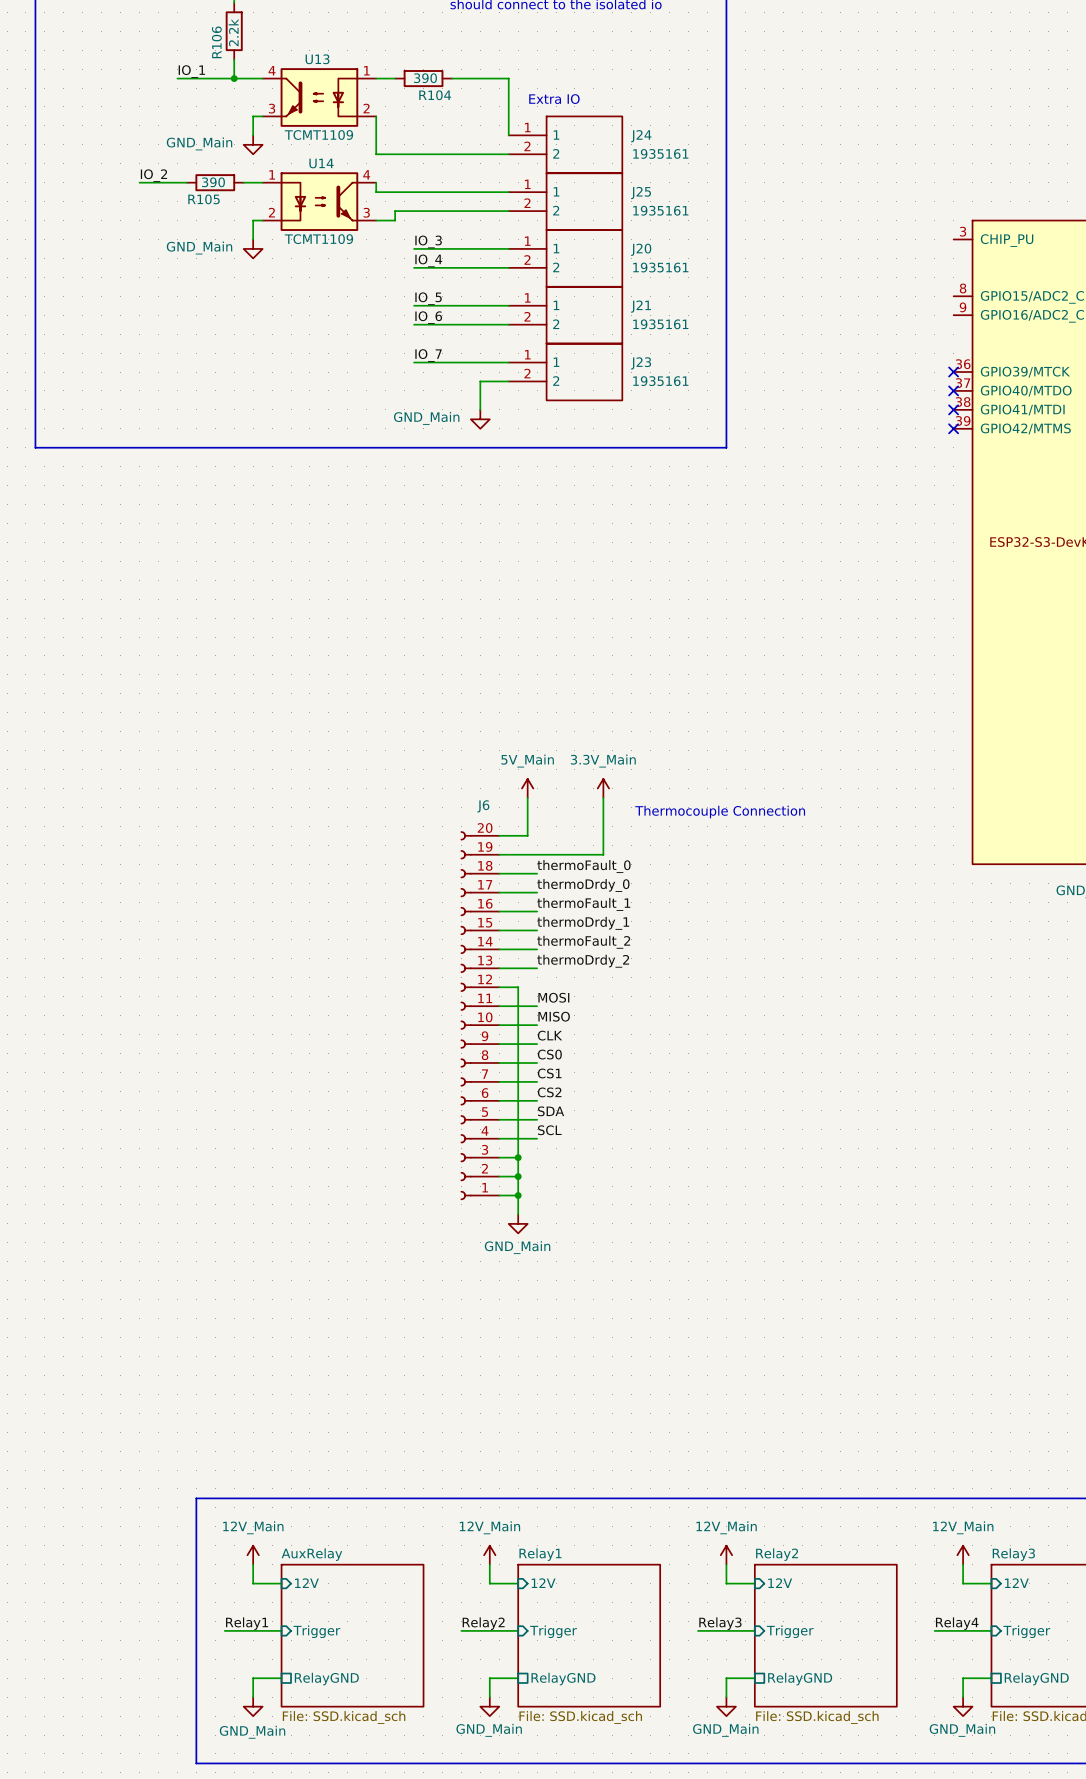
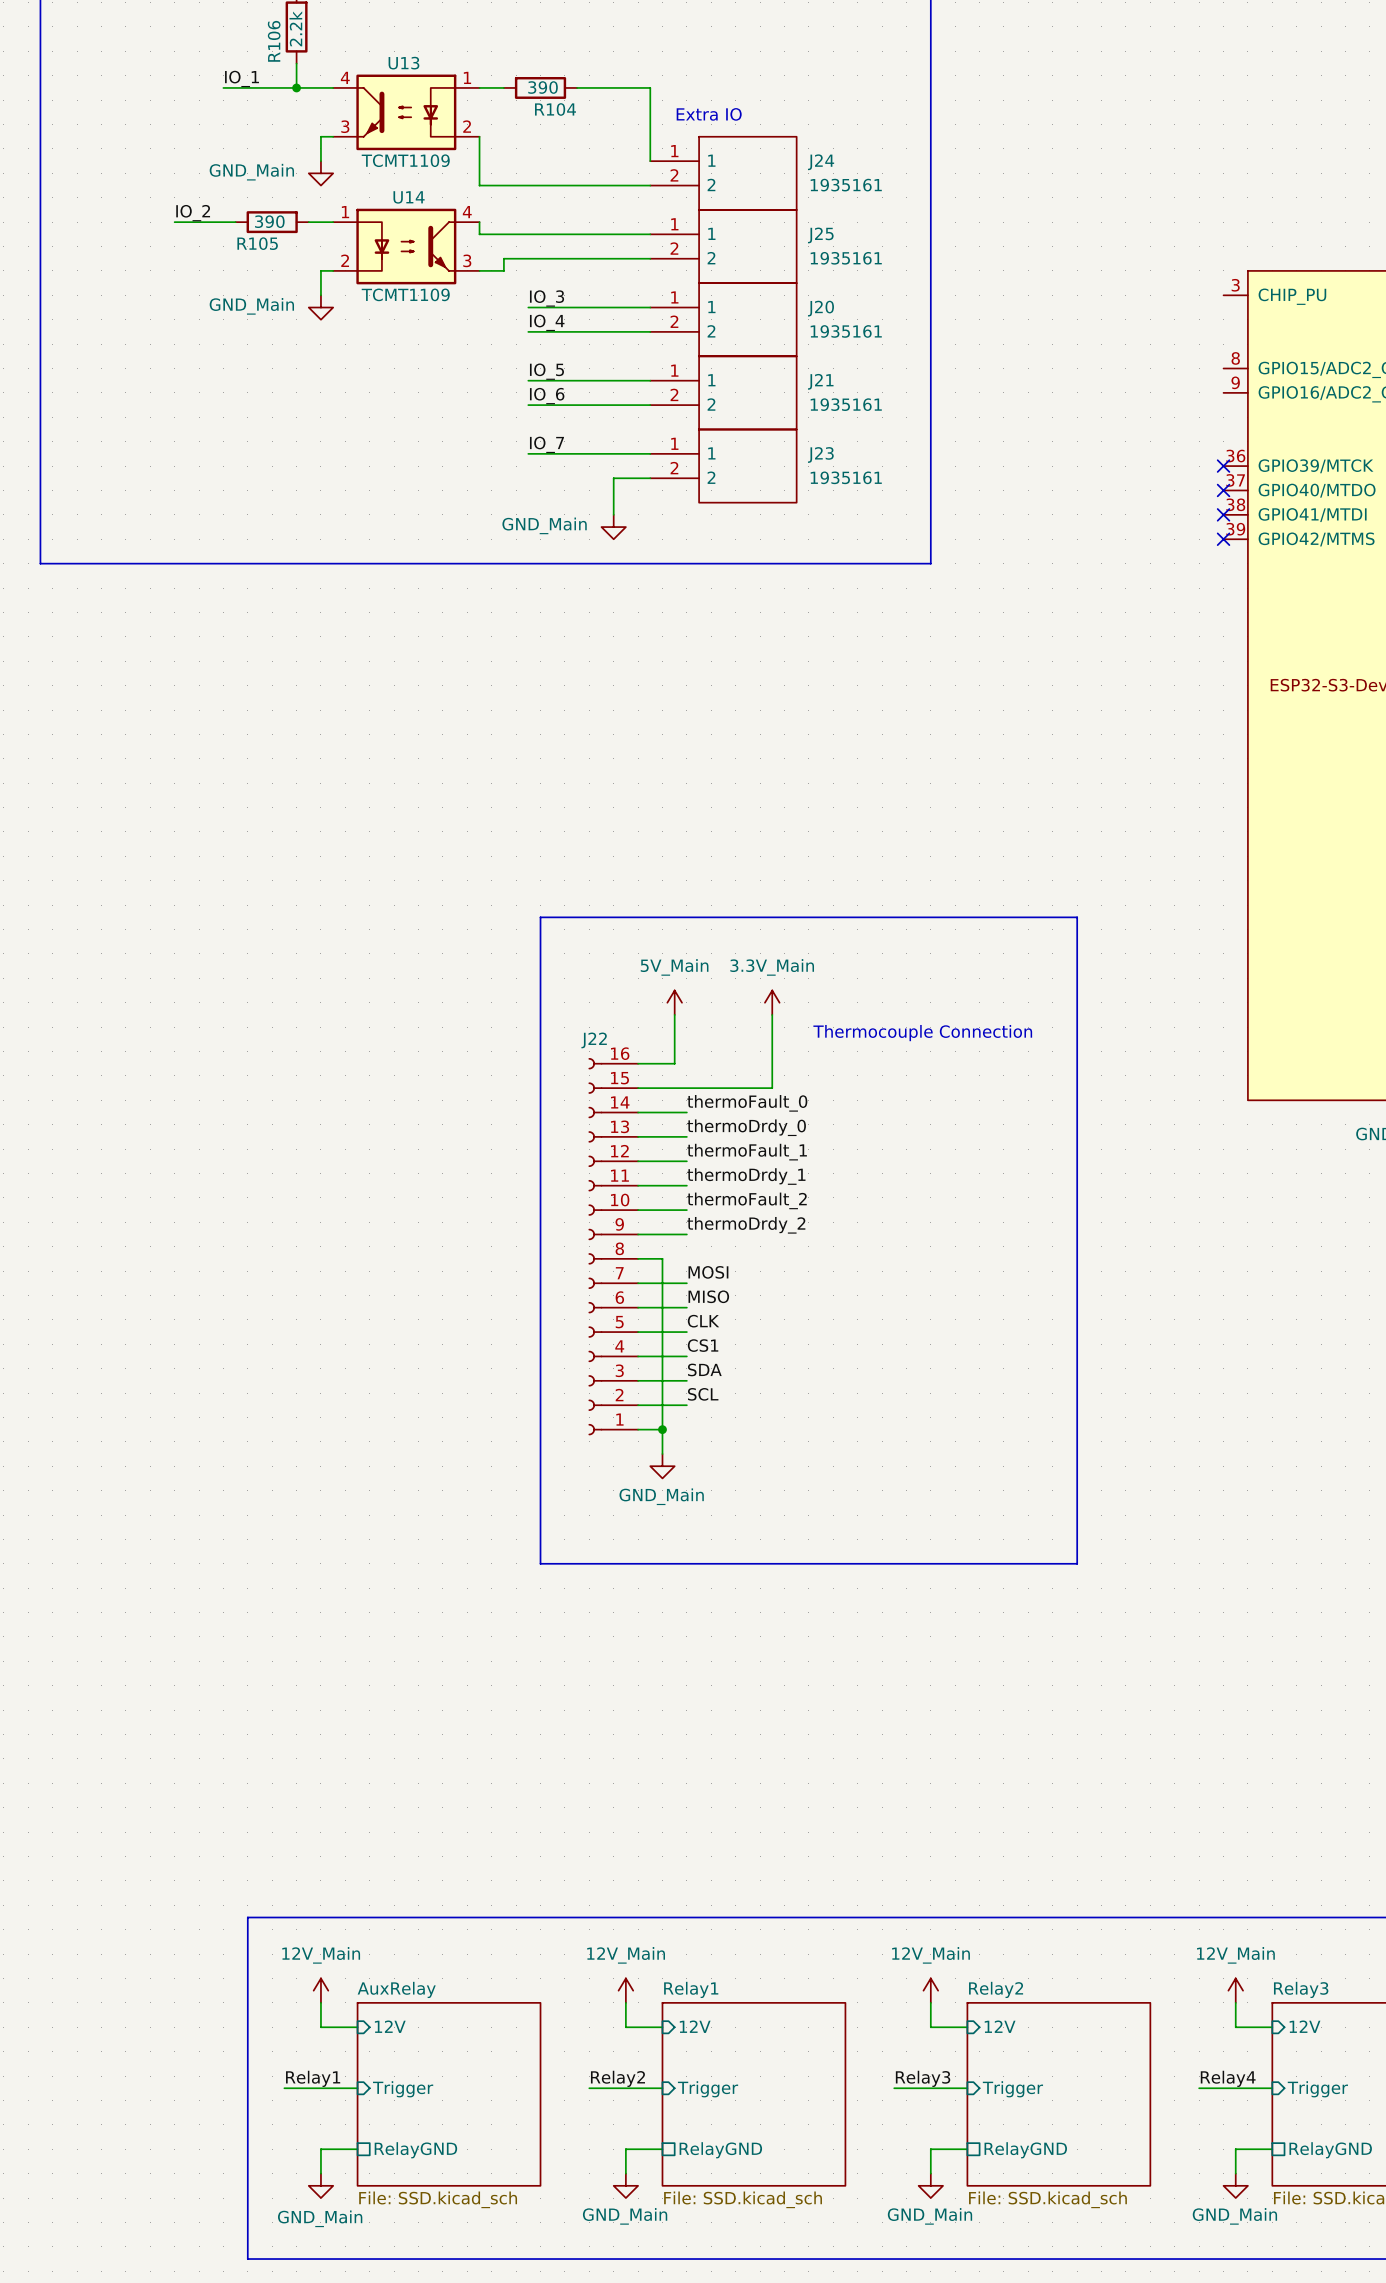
line: none -> (540, 917) (1077, 917) (1077, 1563) (540, 1563) (540, 917)
J22: none -> (613, 1246)
J6: (480, 1015) -> none
label: CS0 (549, 1054) -> CS1 (703, 1345)
label: CS1 (549, 1073) -> SDA (704, 1369)
label: CS2 (549, 1092) -> SCL (703, 1394)
label: SDA (551, 1111) -> none
wire: (518, 1119) (537, 1119) -> none
junction: none -> (662, 1429)
label: SCL (549, 1130) -> none
wire: (499, 1138) (537, 1138) -> none
wire: (518, 1138) (518, 1214) -> none
wire: (499, 1157) (518, 1157) -> none
junction: (518, 1157) -> none
wire: (499, 1176) (518, 1176) -> none
junction: (518, 1176) -> none
wire: (499, 1195) (518, 1195) -> none
junction: (518, 1195) -> none
power symbol position: GND_Main (518, 1223) -> GND_Main (662, 1466)

